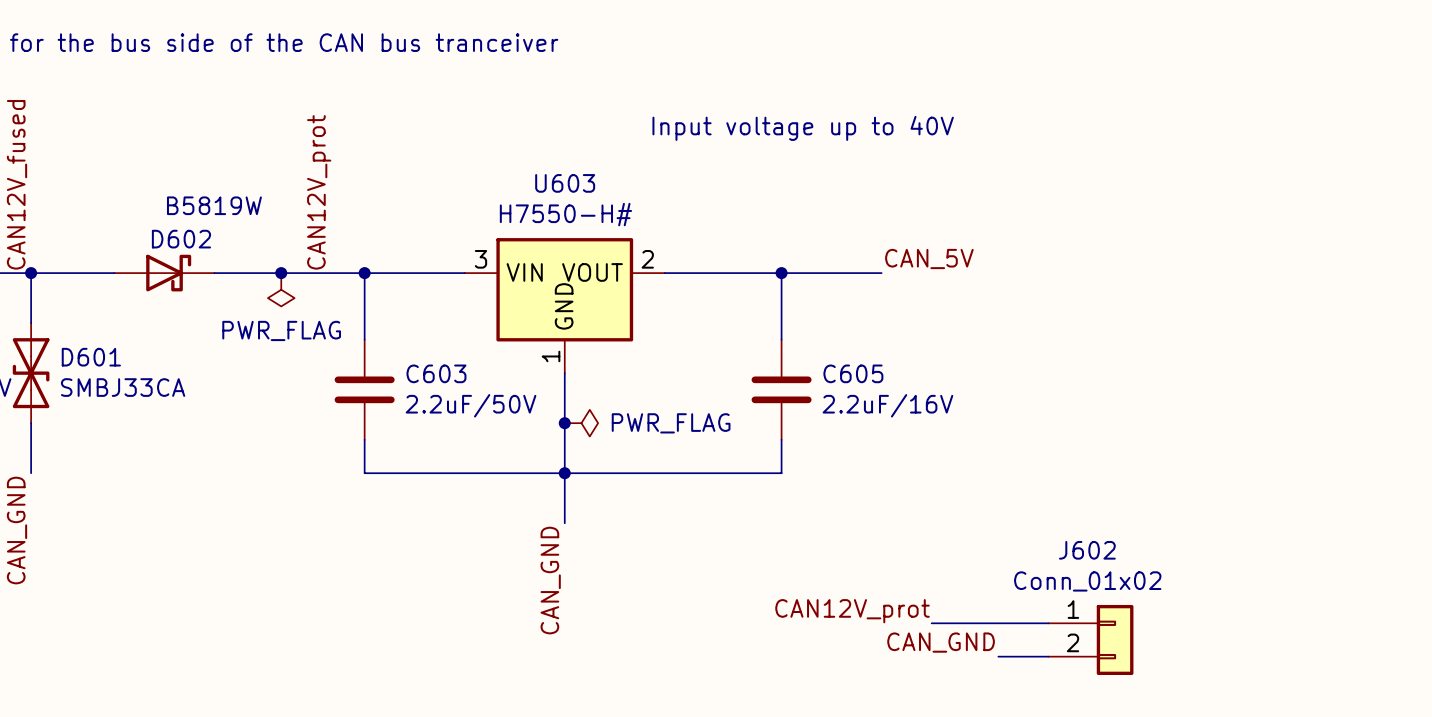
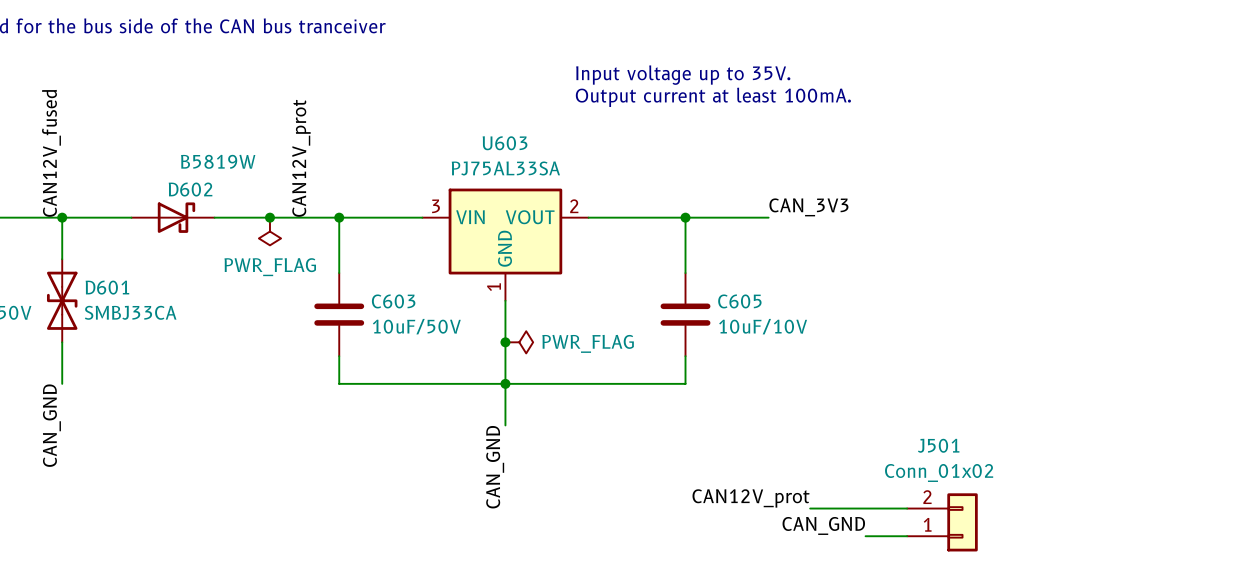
text: none -> Input voltage up to 35V. (683, 75)
text: Input voltage up to 40V (803, 128) -> Output current at least 100mA. (713, 97)
U603 value: H7550-H# (565, 214) -> PJ75AL33SA (505, 168)
label: CAN_5V (929, 259) -> CAN_3V3 (808, 207)
C603 value: 2.2uF/50V (471, 405) -> 10uF/50V (416, 326)
C605 value: 2.2uF/16V (887, 405) -> 10uF/10V (763, 326)
J602 name: J602 (1087, 550) -> J501 (938, 445)
J602 flip: as is (1115, 639) -> up-down (962, 522)

